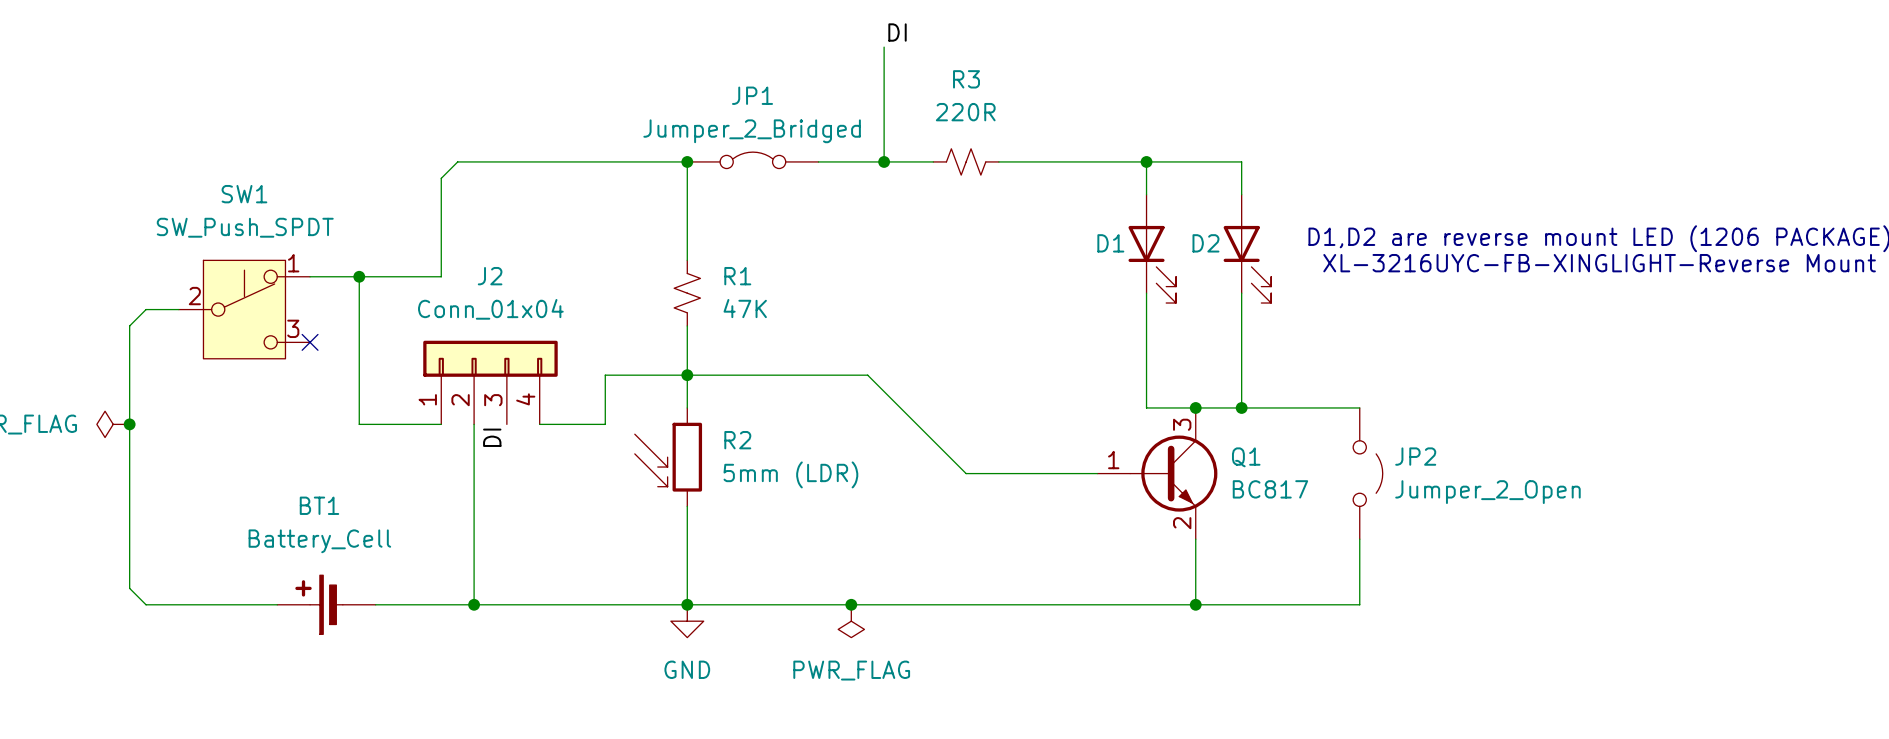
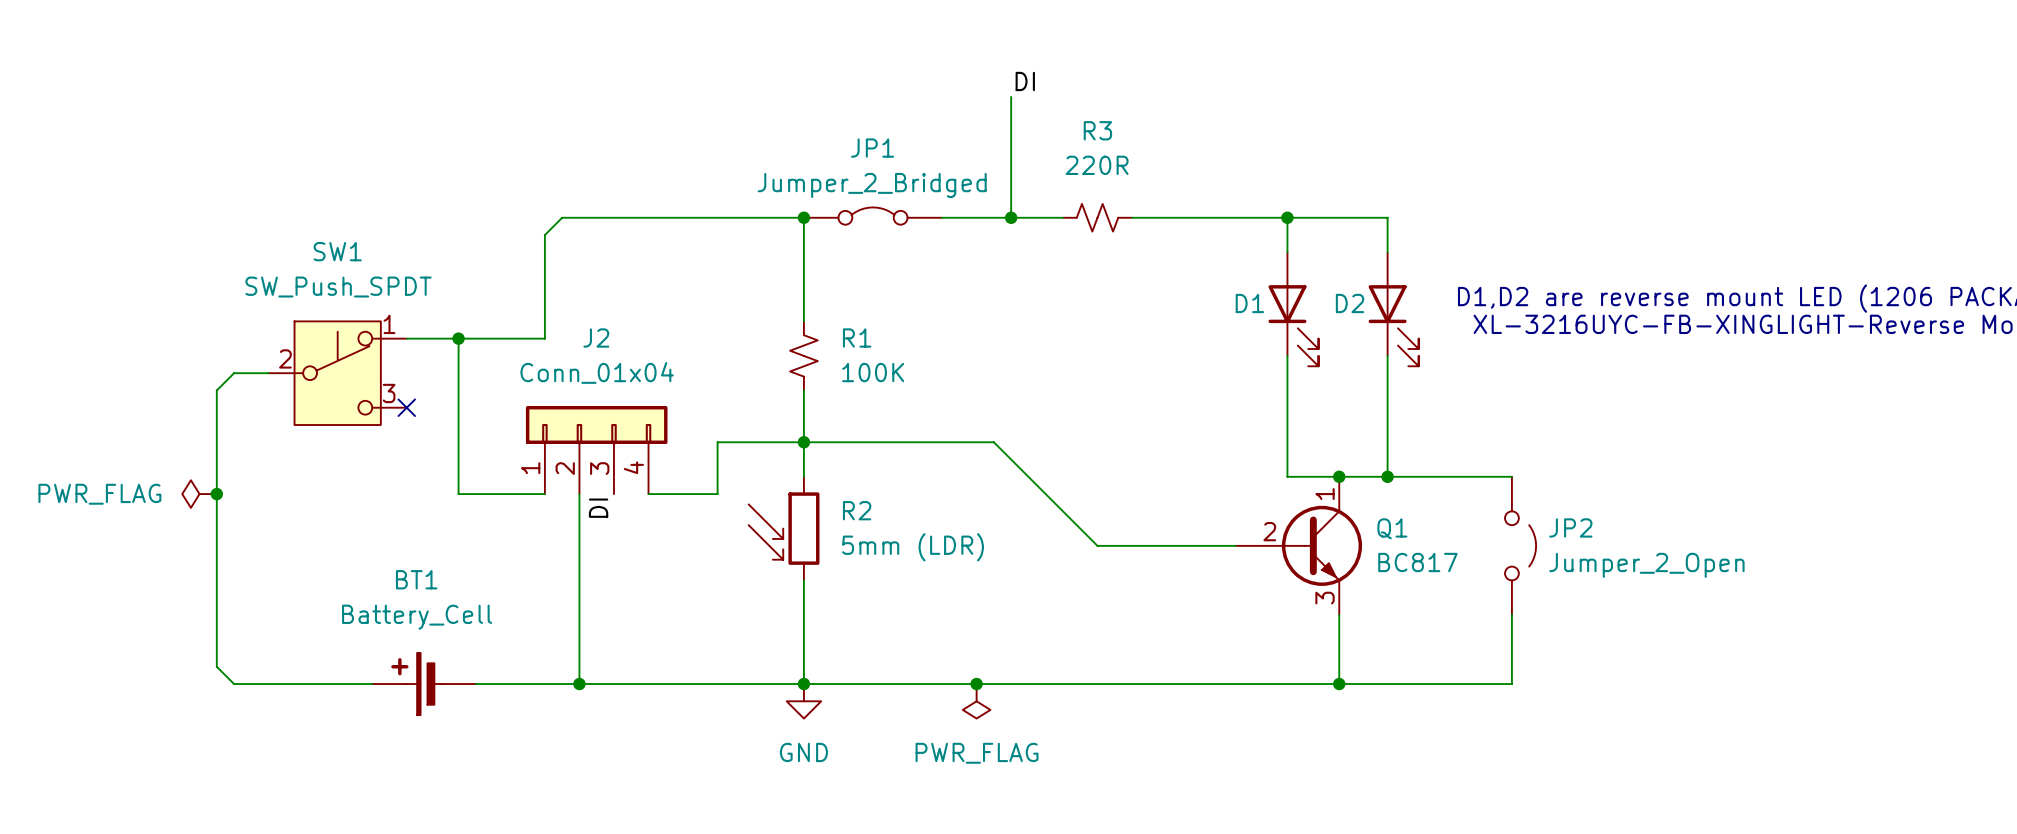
R1 value: 47K (745, 308) -> 100K (873, 372)
Q1 symbol: [1097, 407, 1218, 540] -> [1235, 476, 1363, 615]

